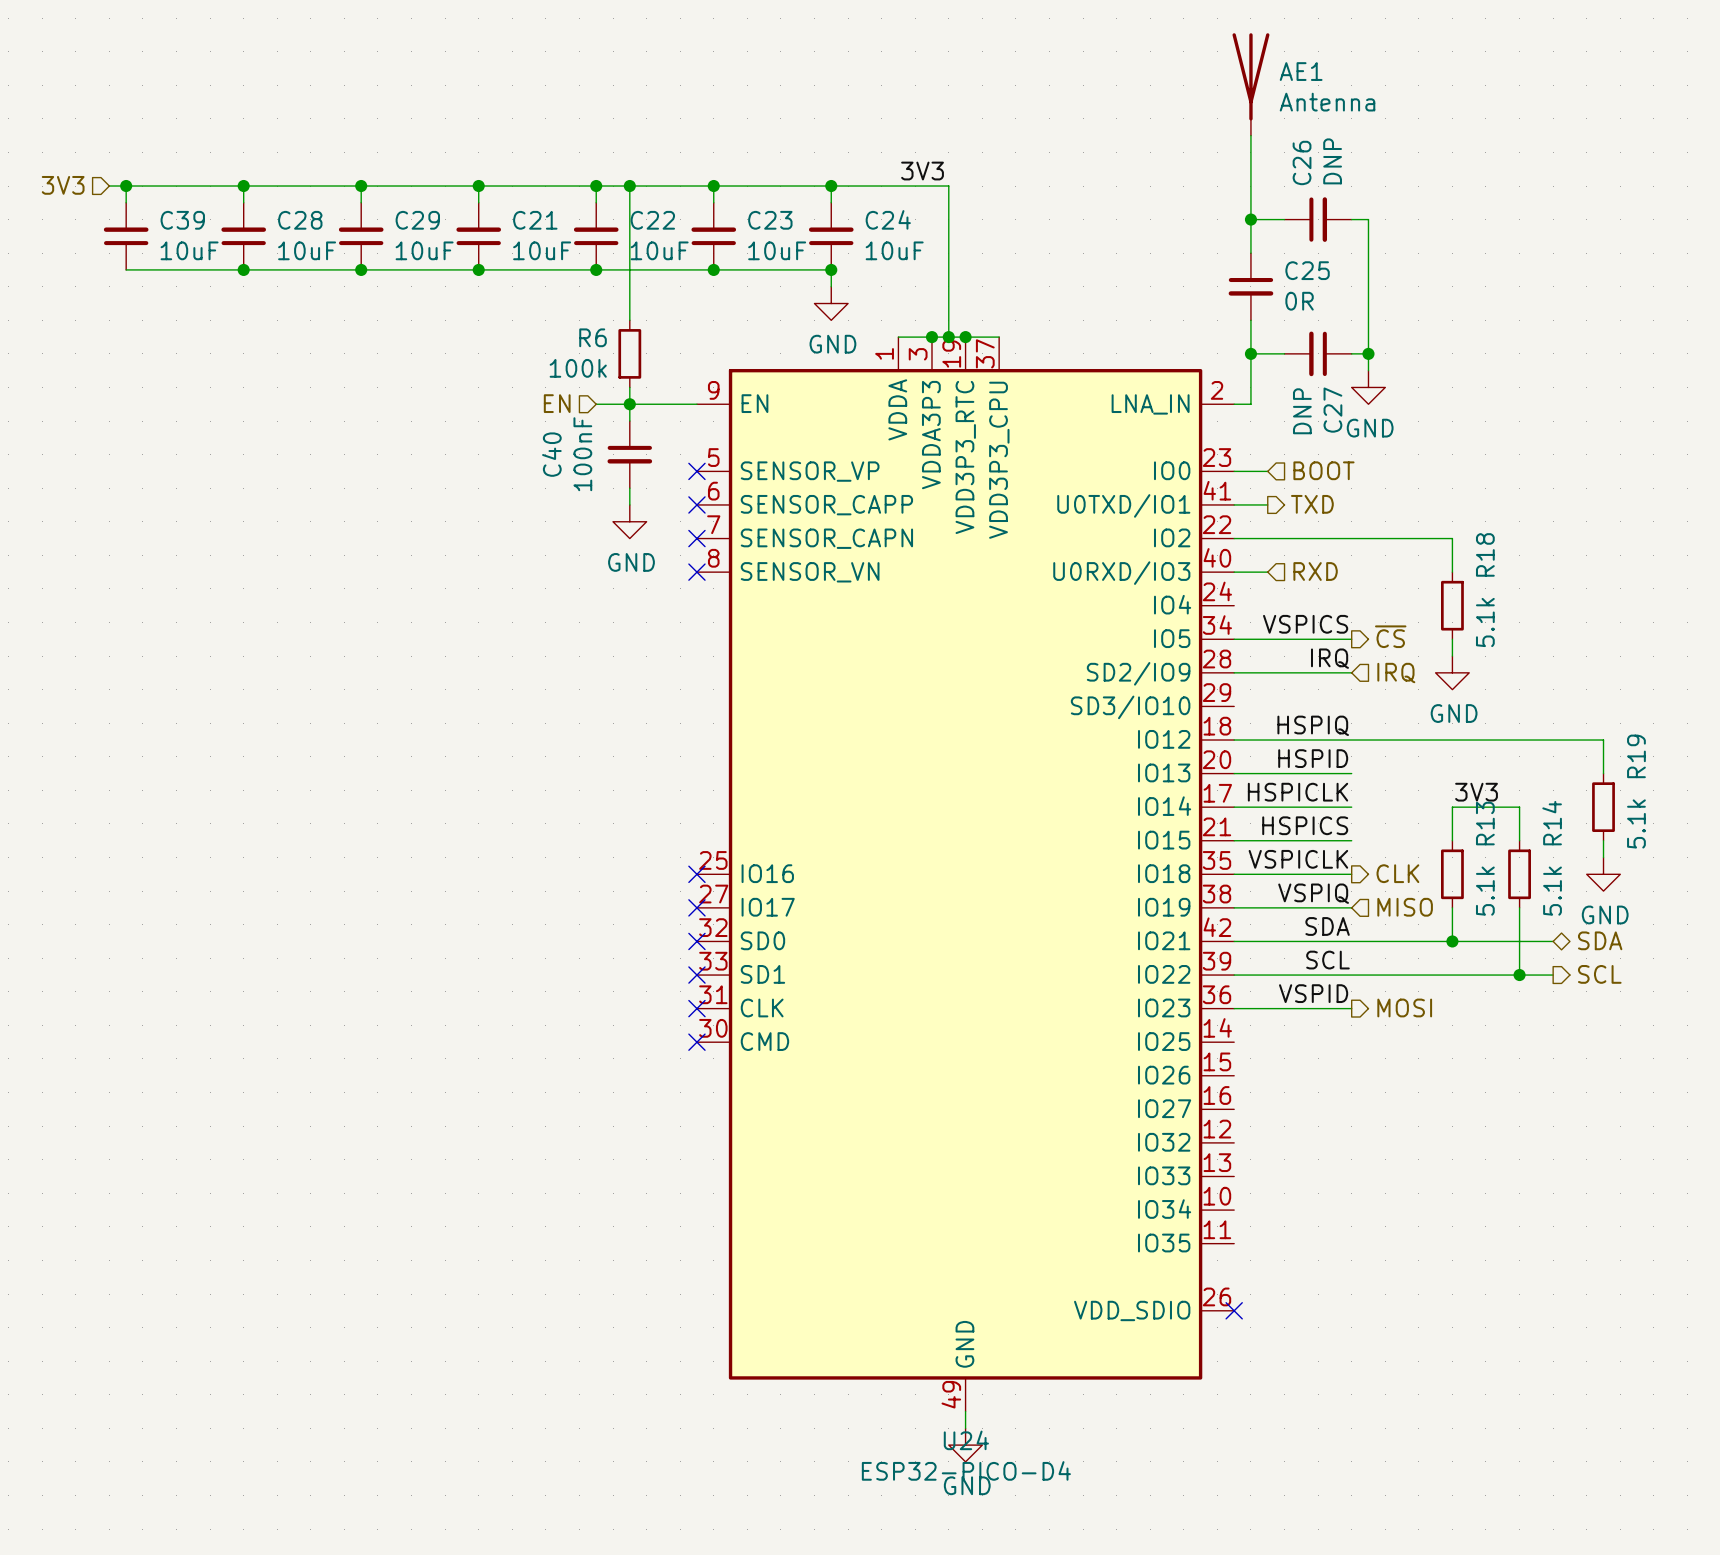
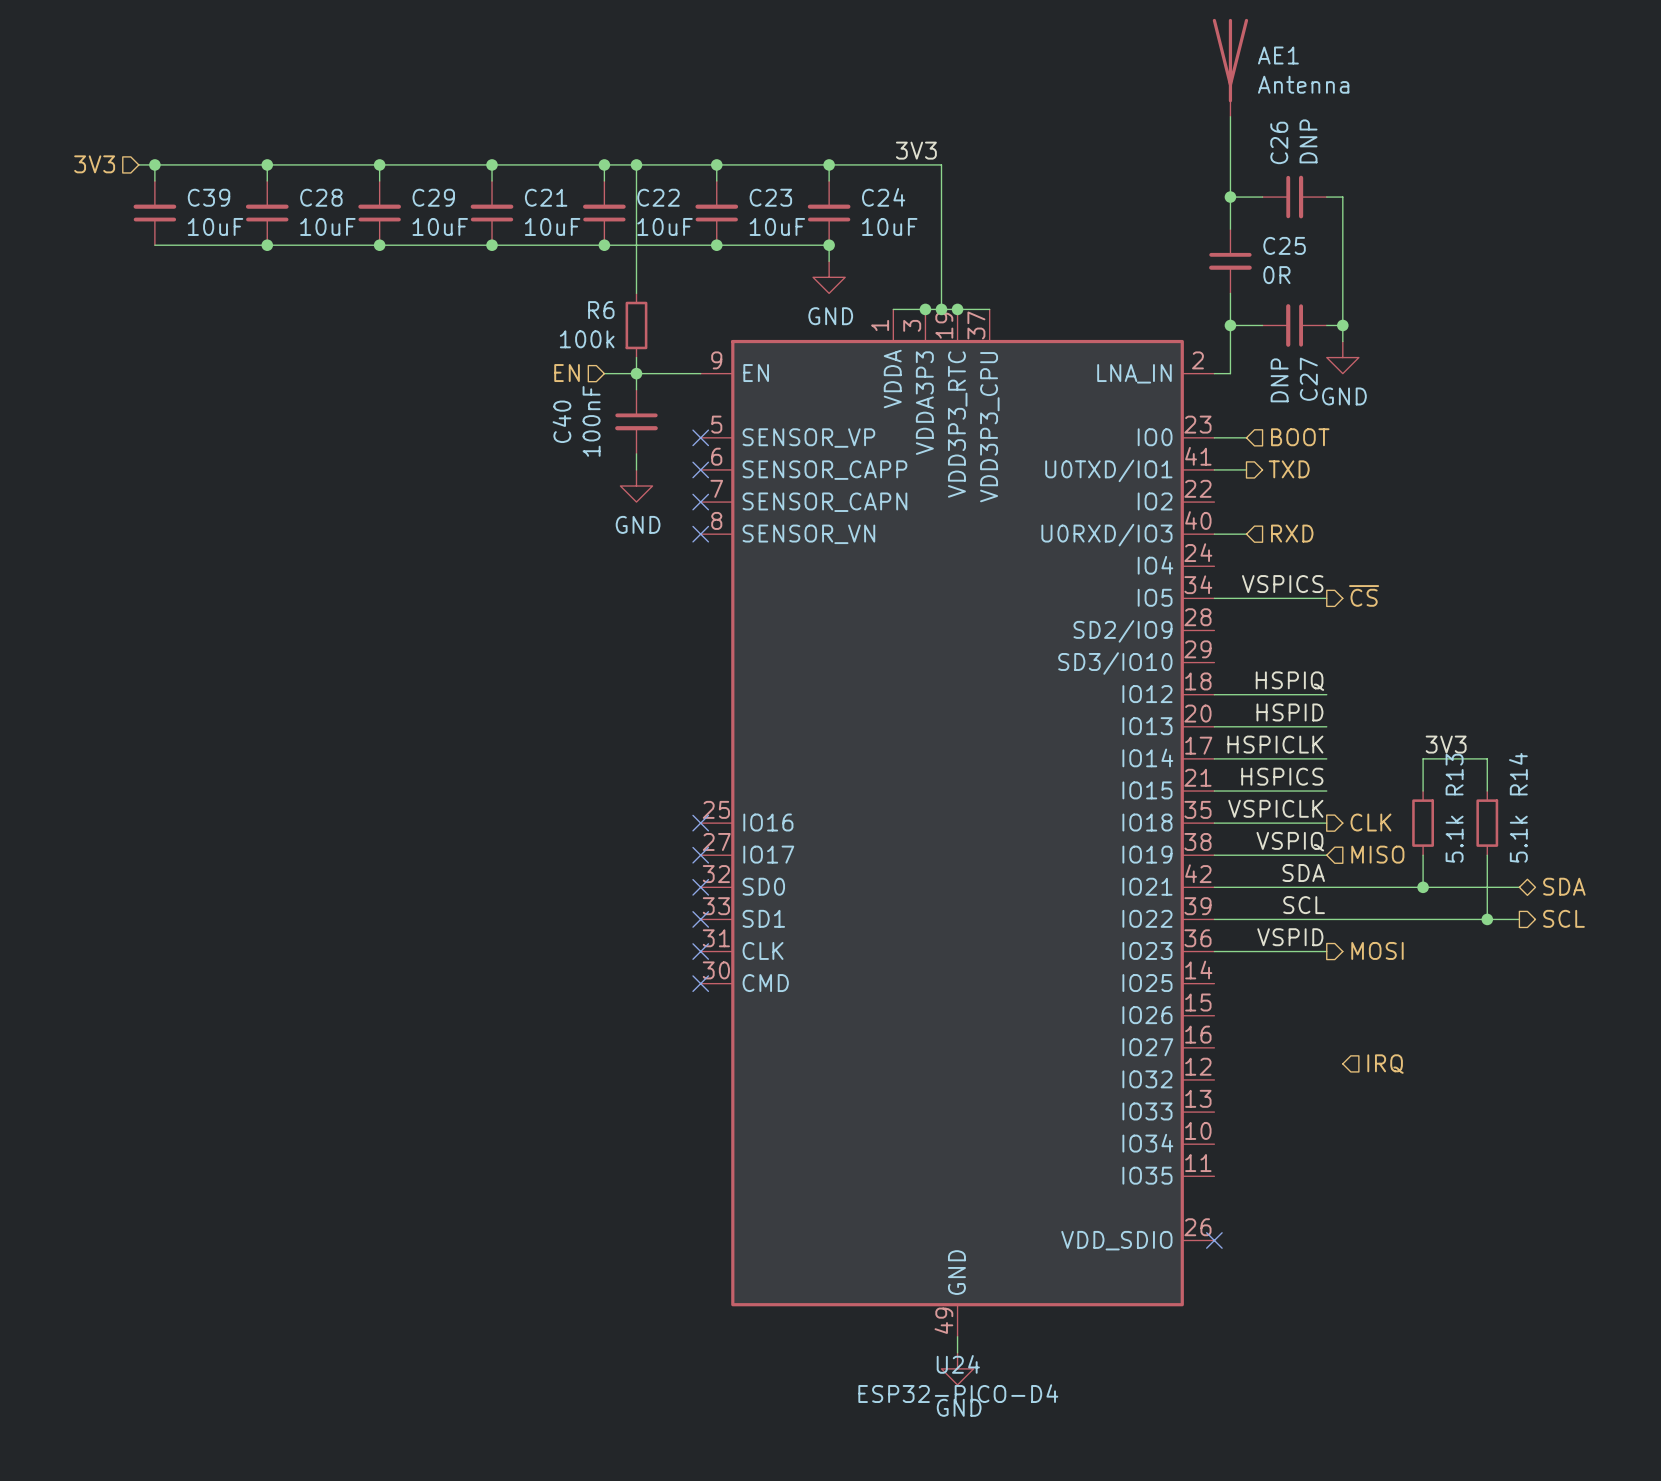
wire: (1234, 538) (1452, 538) (1452, 572) -> none
R18: 5.1k (1452, 605) -> none
wire: (1452, 639) (1452, 656) -> none
label: IRQ (1329, 658) -> none
wire: (1234, 672) (1351, 672) -> none
power symbol: GND (1452, 672) -> none
hierarchical label: IRQ (1396, 673) -> none
wire: (1351, 740) (1603, 740) (1603, 773) -> none
R19: 5.1k (1603, 807) -> none
wire: (1603, 840) (1603, 857) -> none
power symbol: GND (1603, 874) -> none
hierarchical label: none -> IRQ (1385, 1064)

